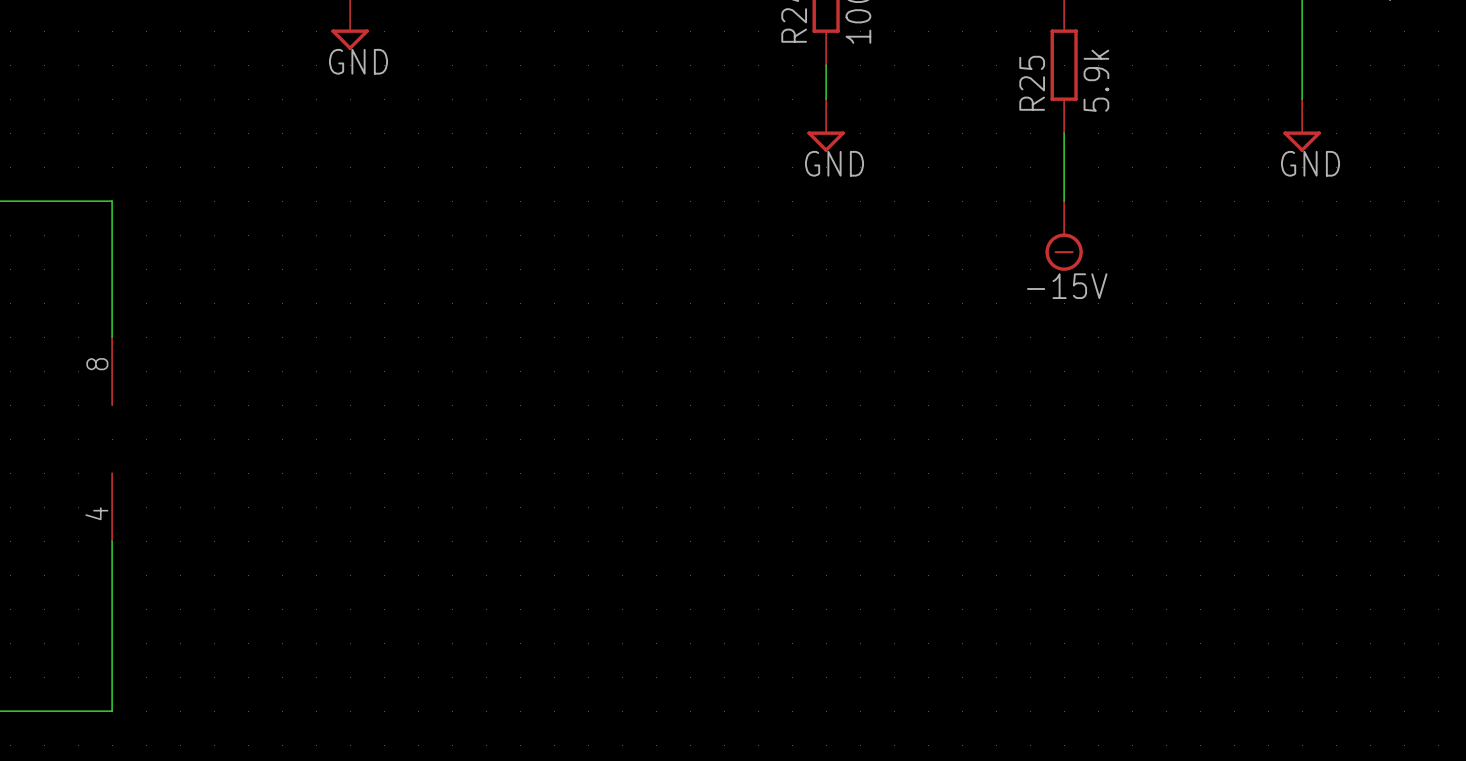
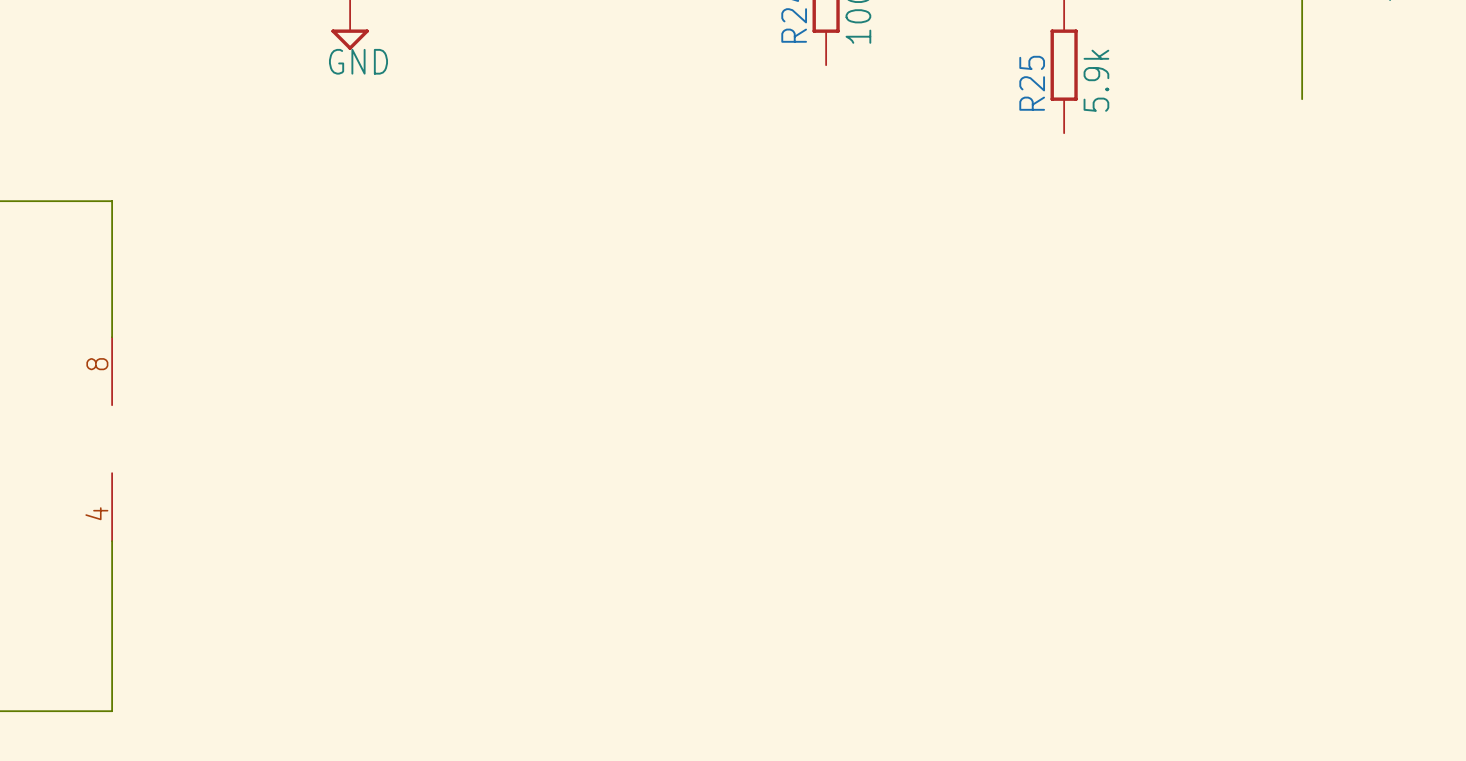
wire: (826, 65) (826, 99) -> none
power symbol: GND (826, 125) -> none
power symbol: GND (1302, 125) -> none
wire: (1064, 133) (1064, 201) -> none
power symbol: -15V (1064, 236) -> none

